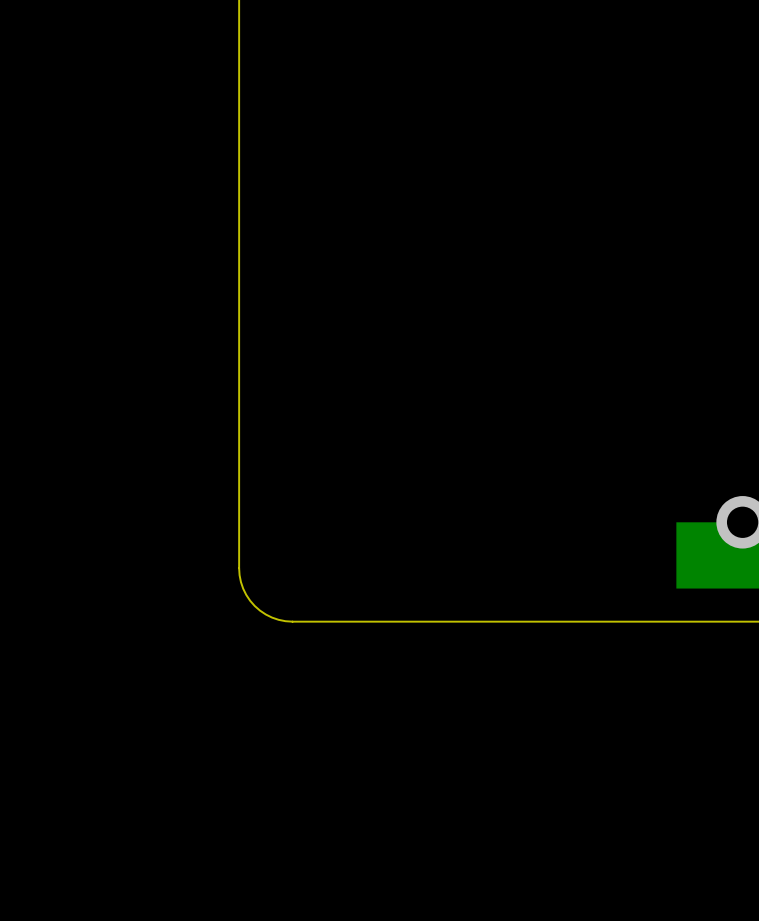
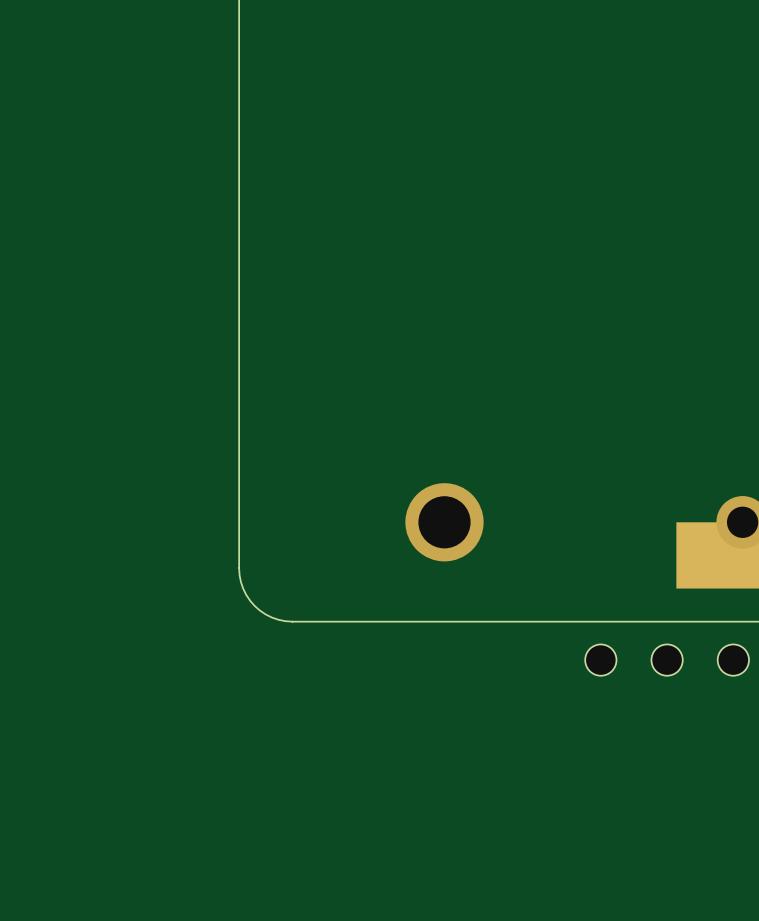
via: none -> (444, 522)
hole: none -> (600, 660)
hole: none -> (667, 660)
hole: none -> (733, 660)

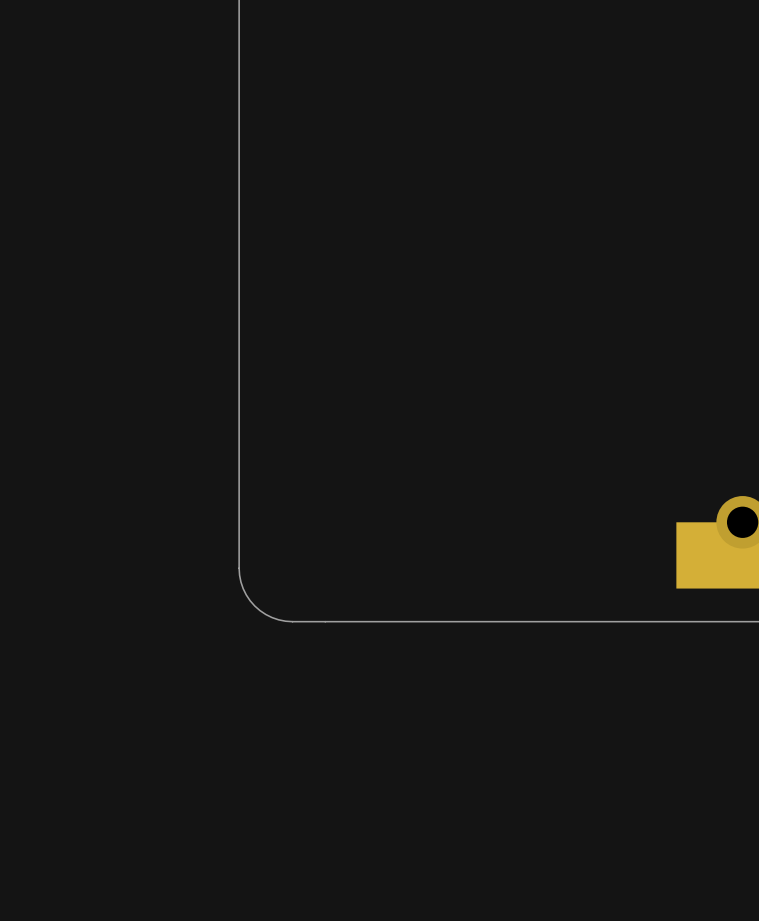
via: (444, 522) -> none
hole: (600, 660) -> none
hole: (667, 660) -> none
hole: (733, 660) -> none

